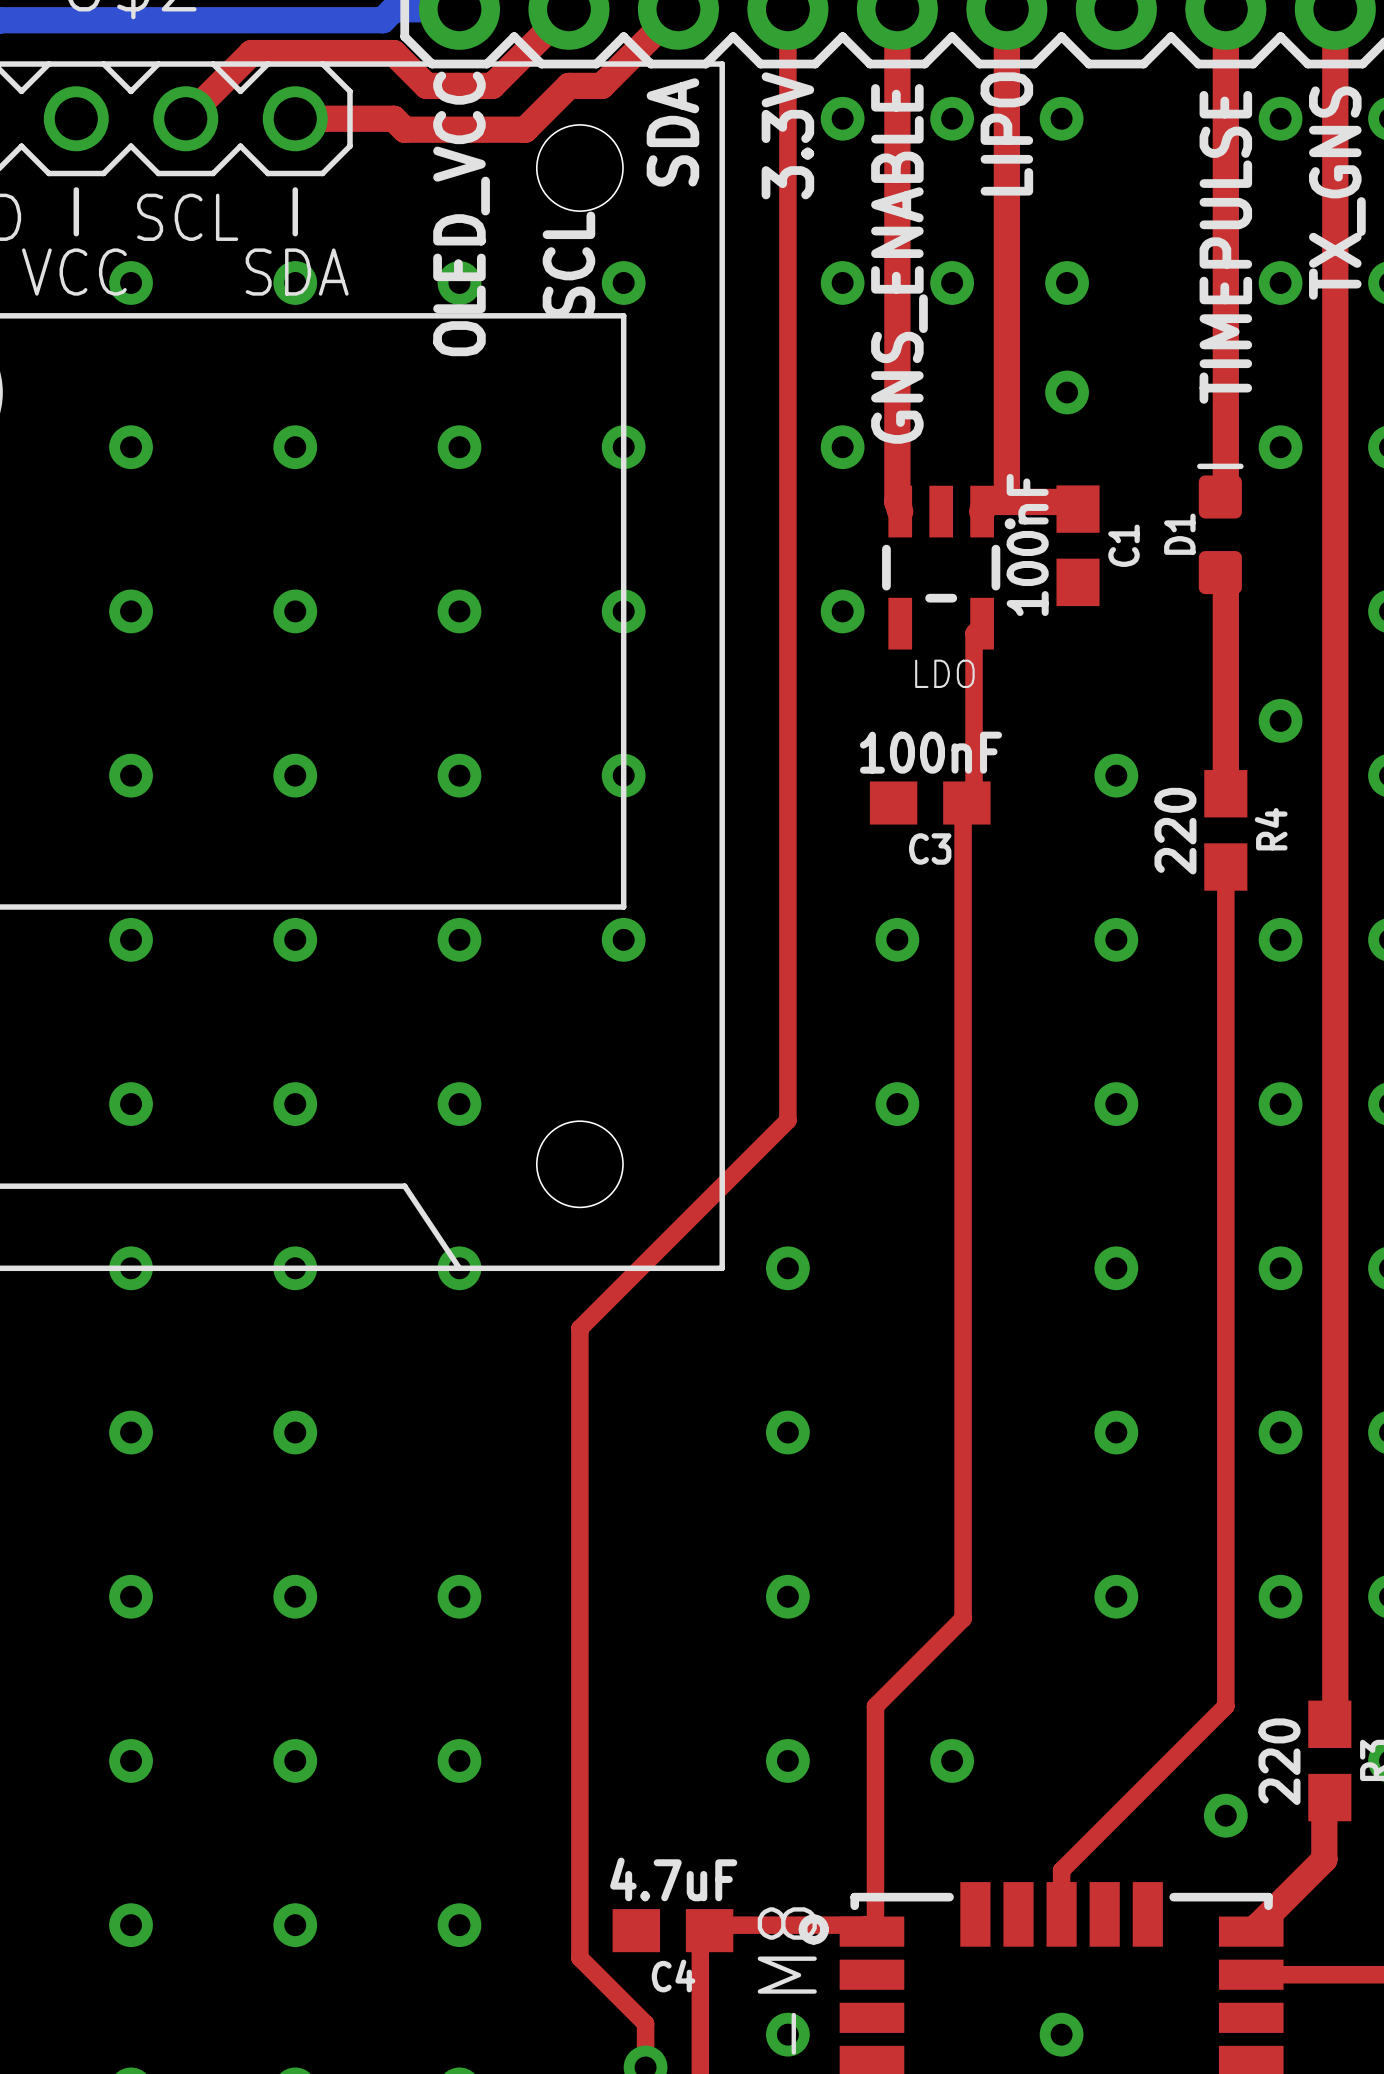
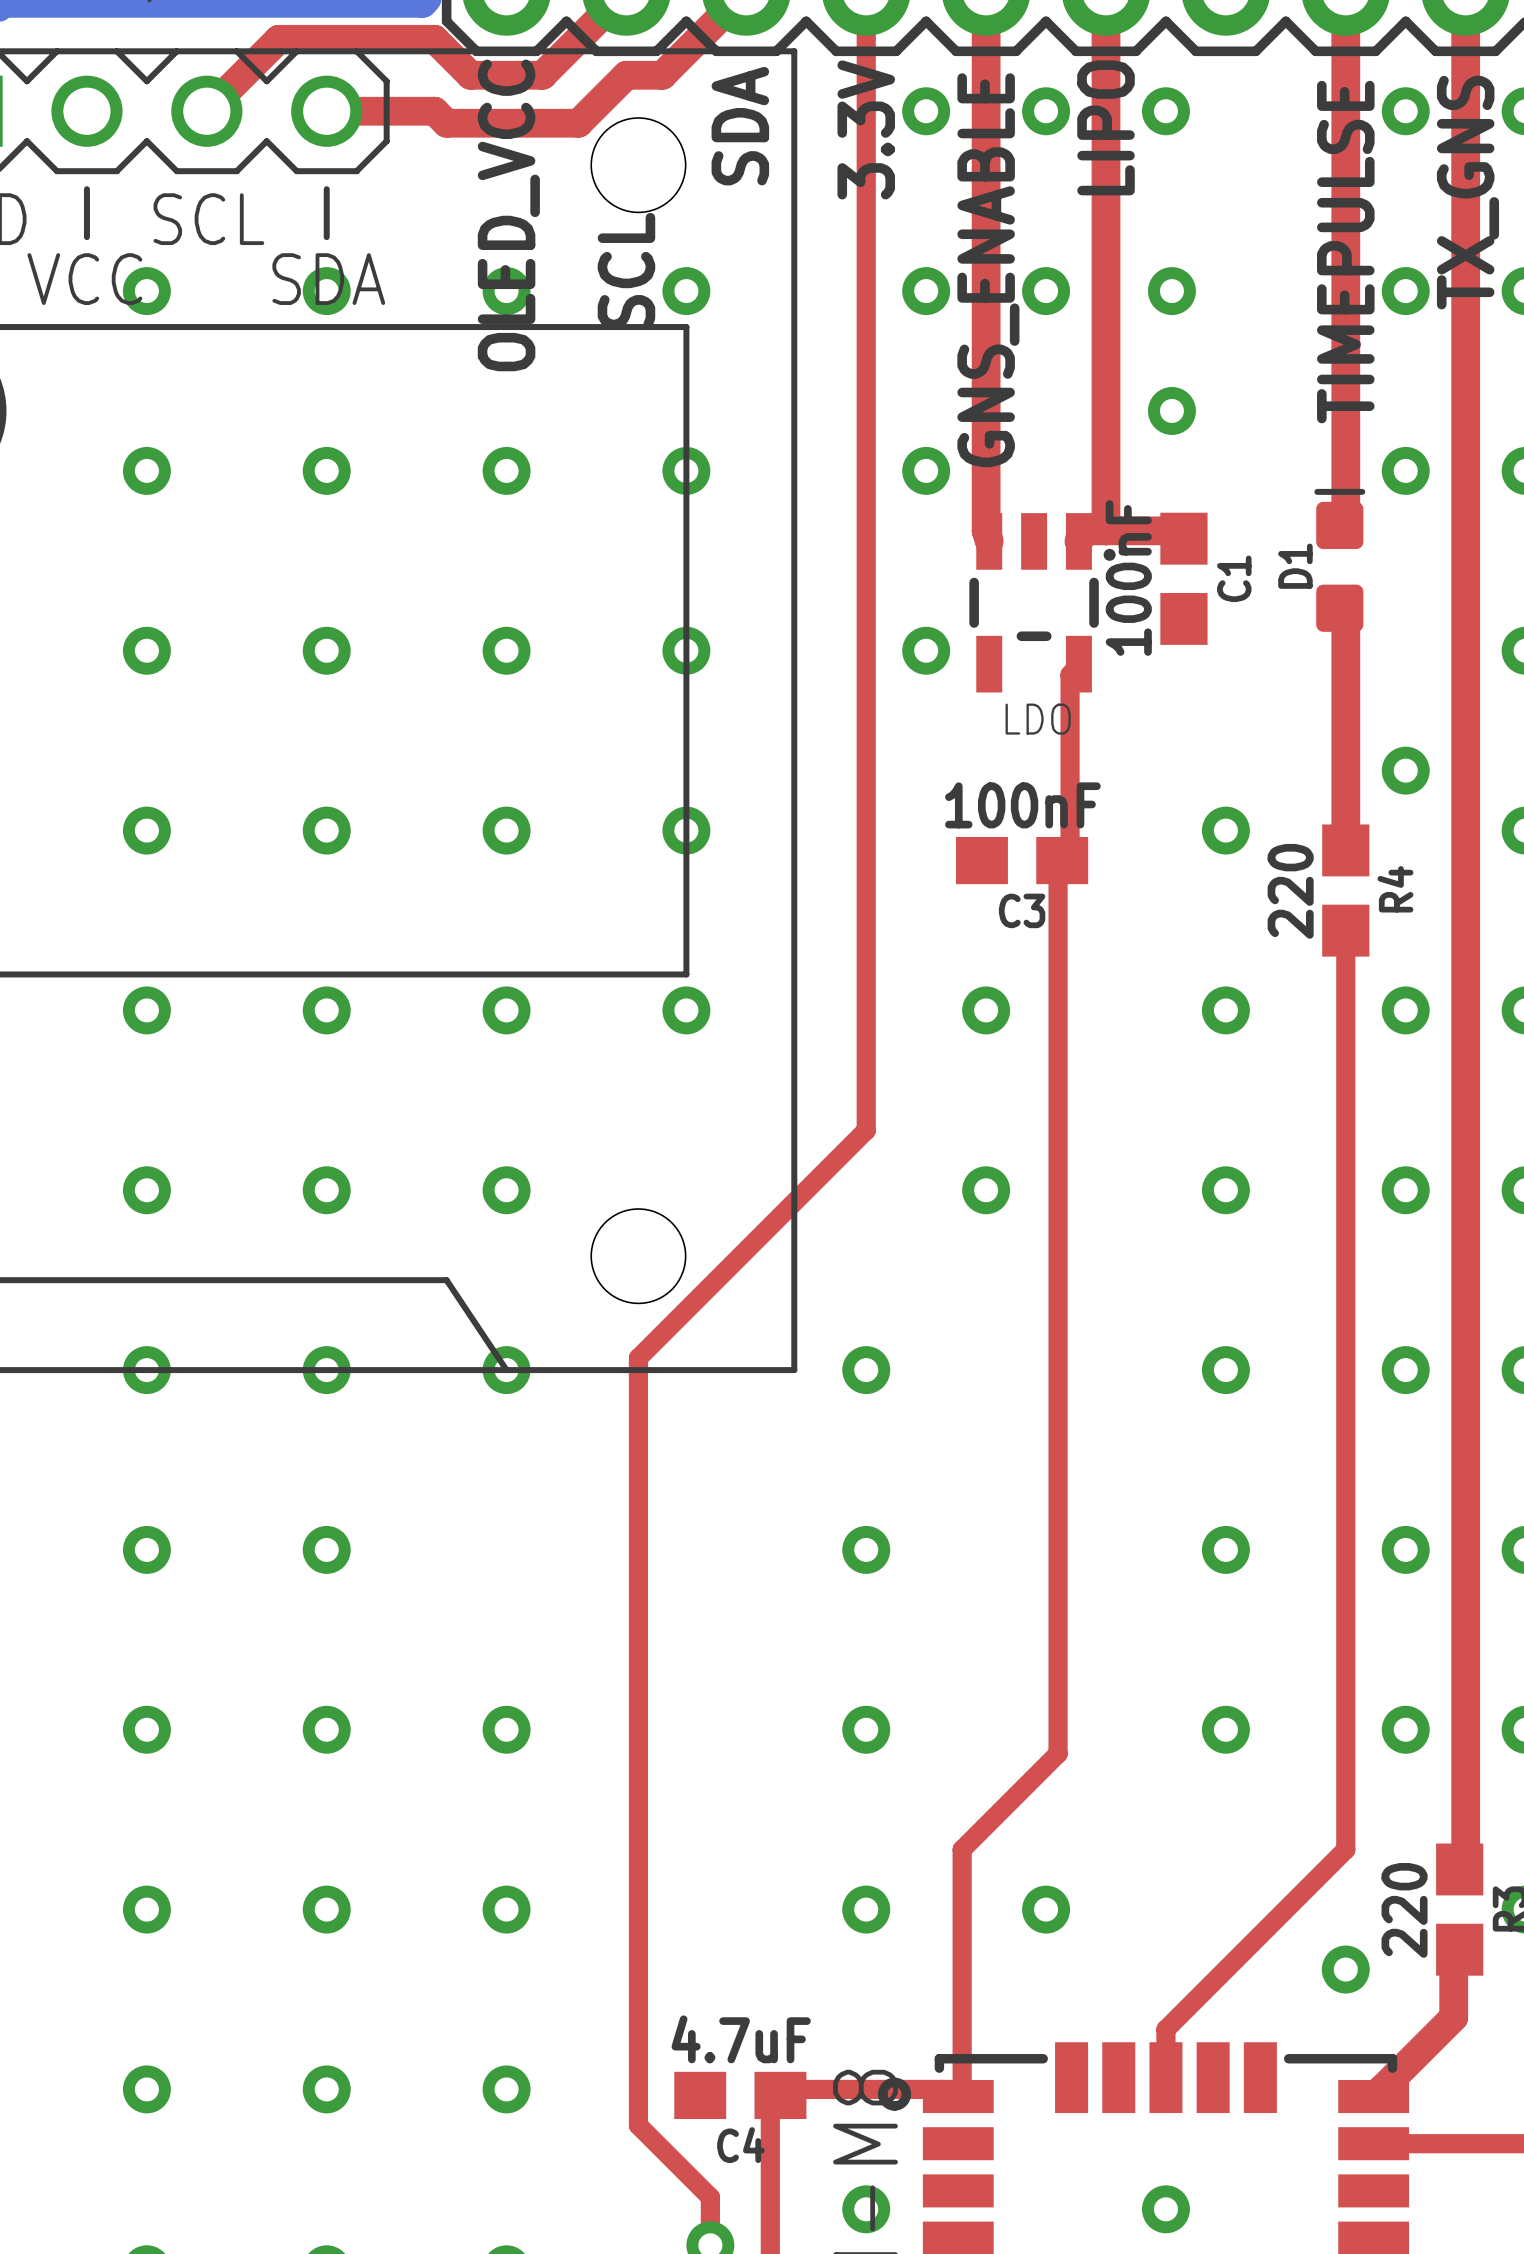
top track: (787, 1049) (787, 1120) (579, 1328) -> (866, 1130) (638, 1358) (638, 1436)

